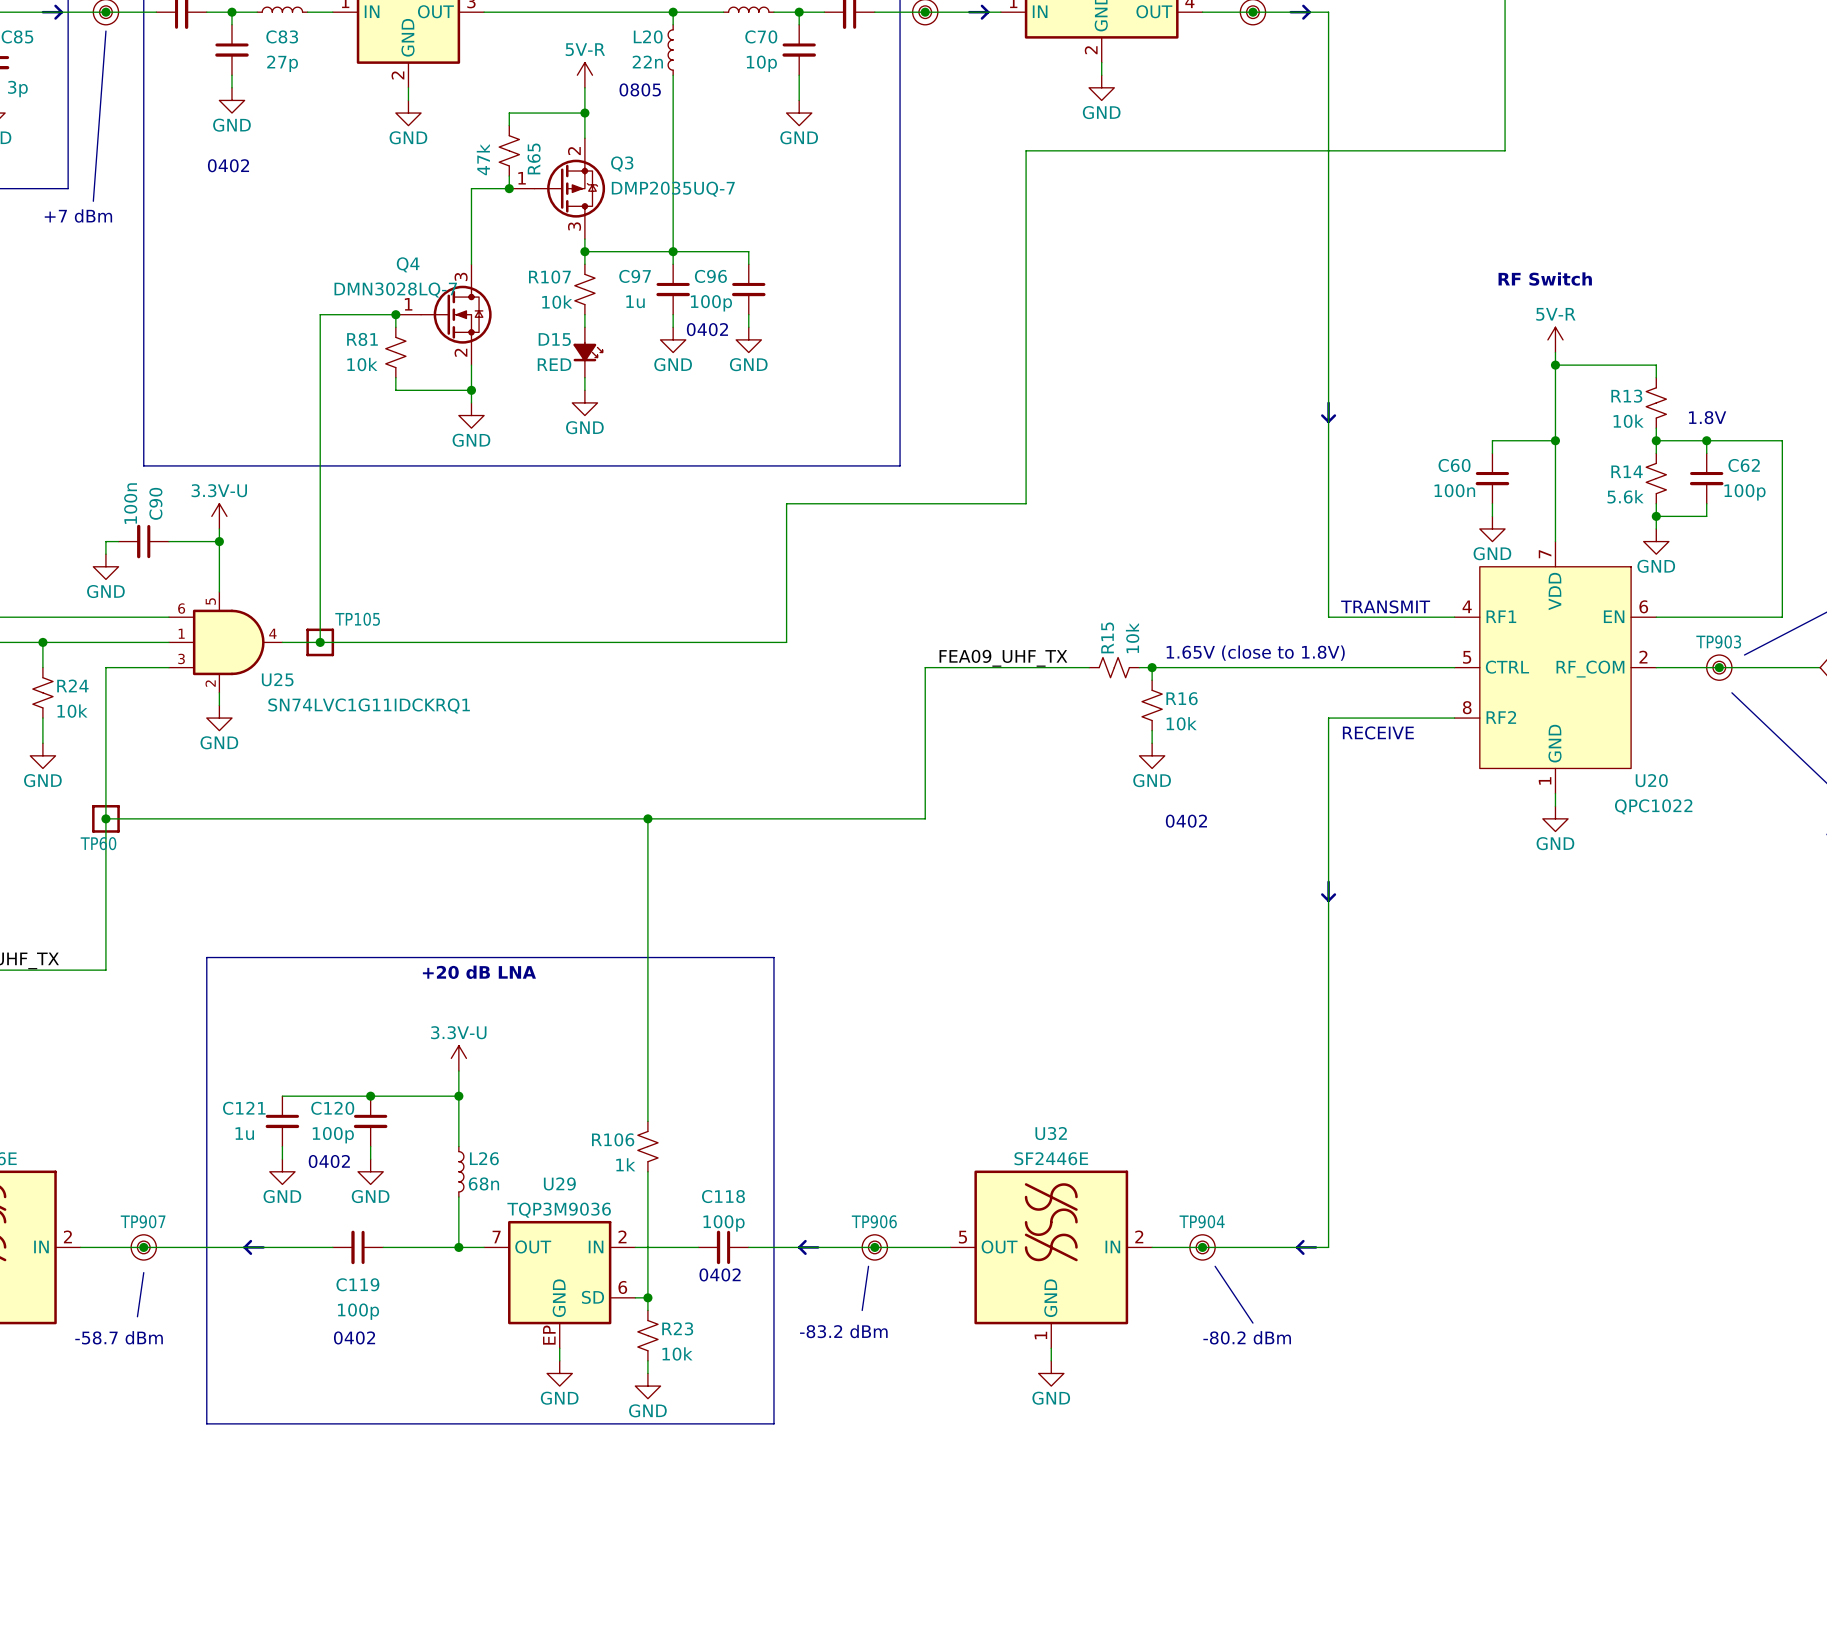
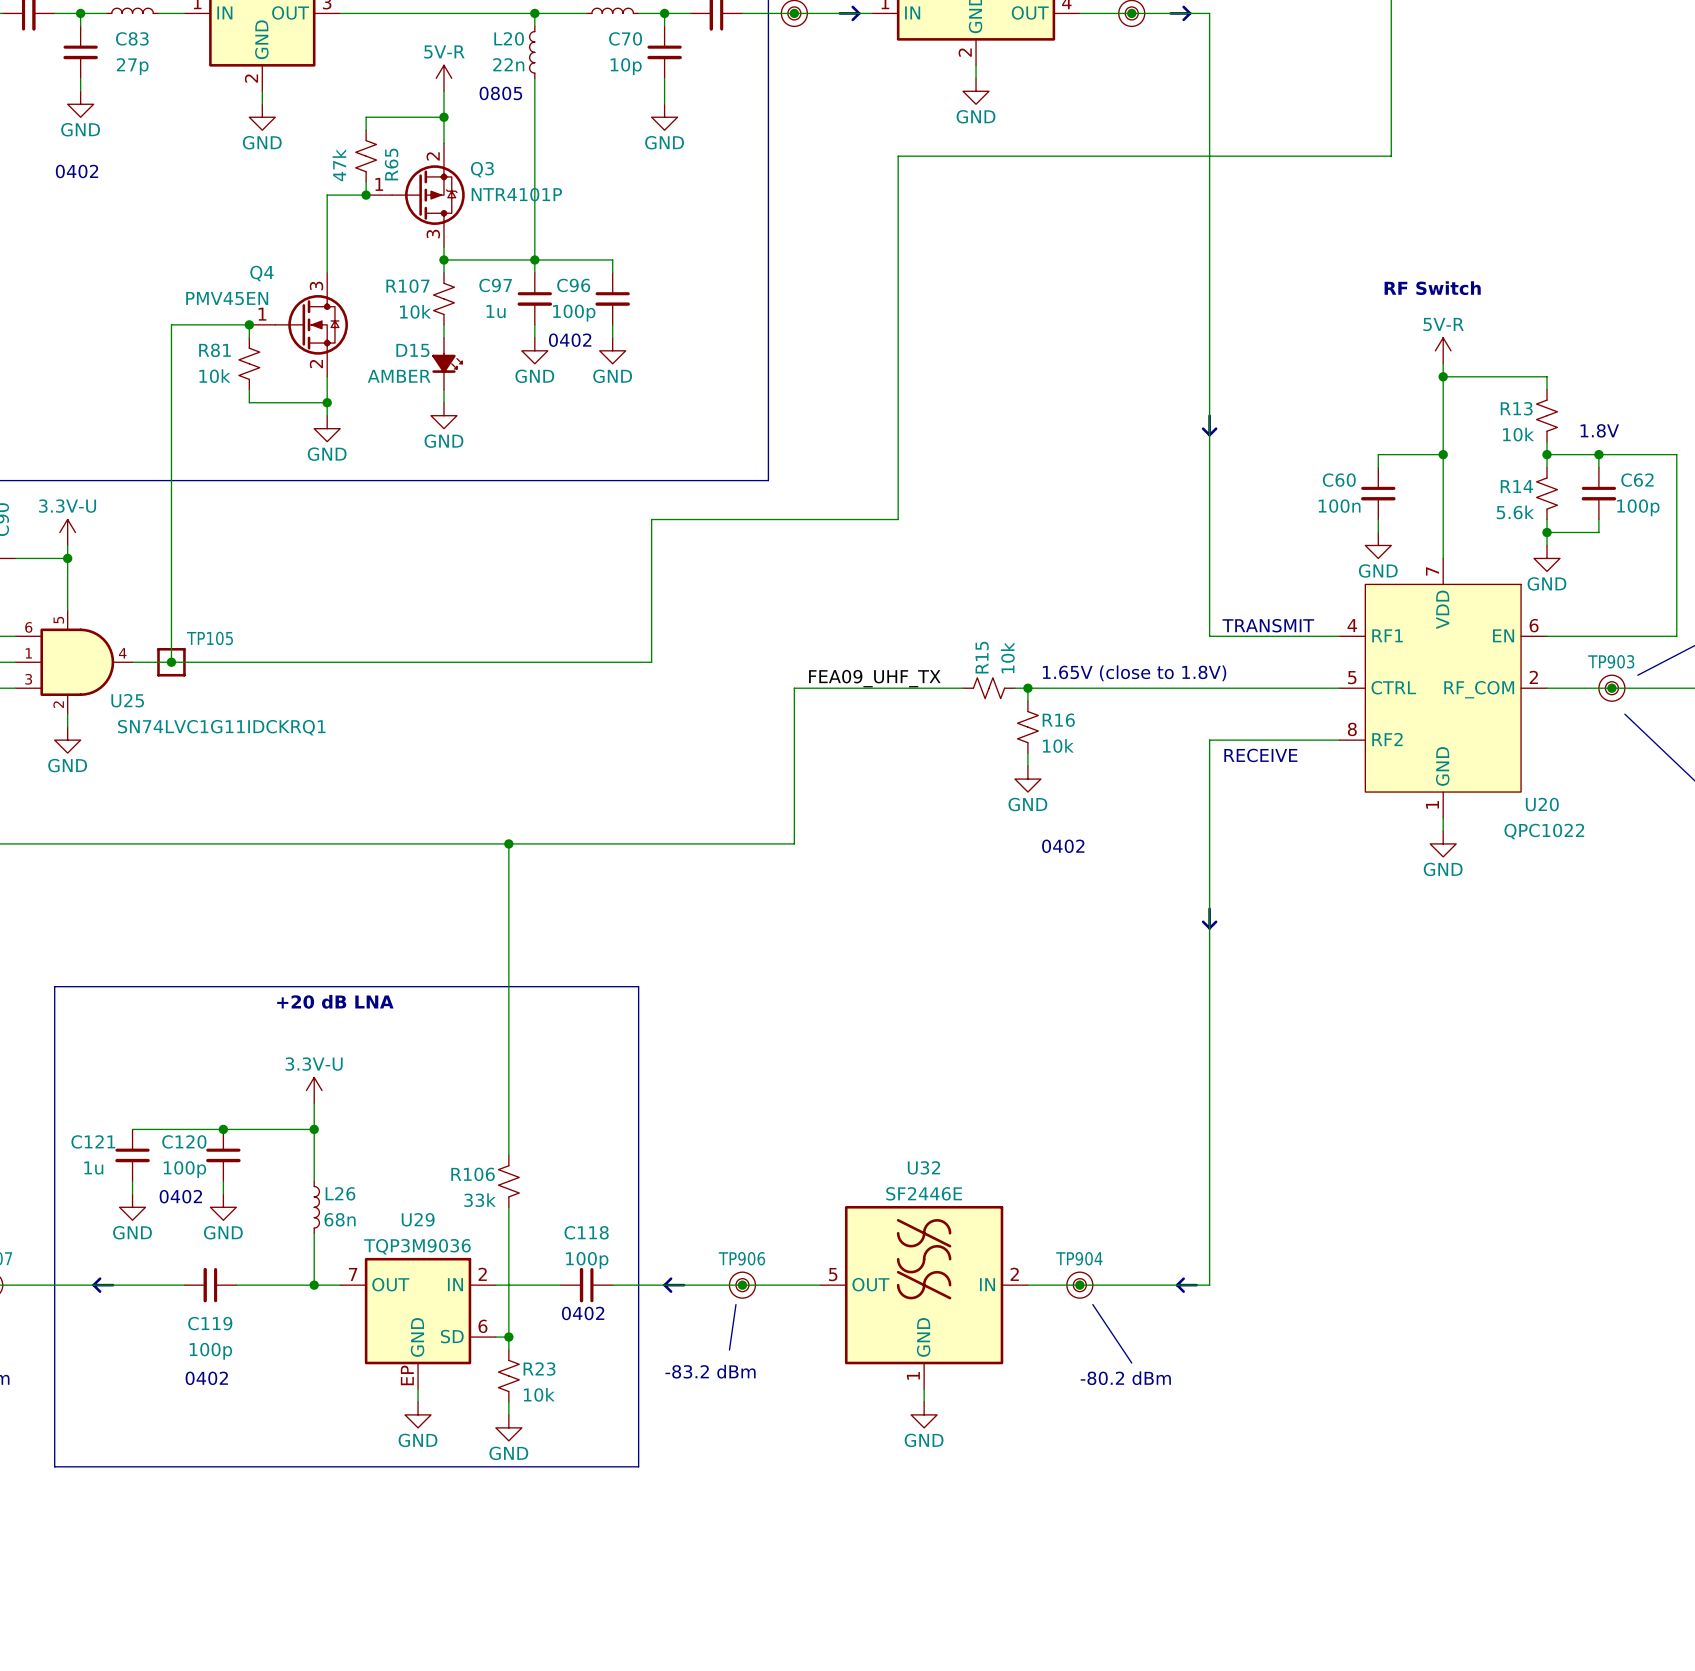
Q3 value: DMP2035UQ-7 (673, 189) -> NTR4101P (516, 194)
Q4 value: DMN3028LQ-7 (395, 290) -> PMV45EN (227, 298)
D15 value: RED (554, 364) -> AMBER (399, 376)
R106 value: 1k (625, 1164) -> 33k (480, 1200)

